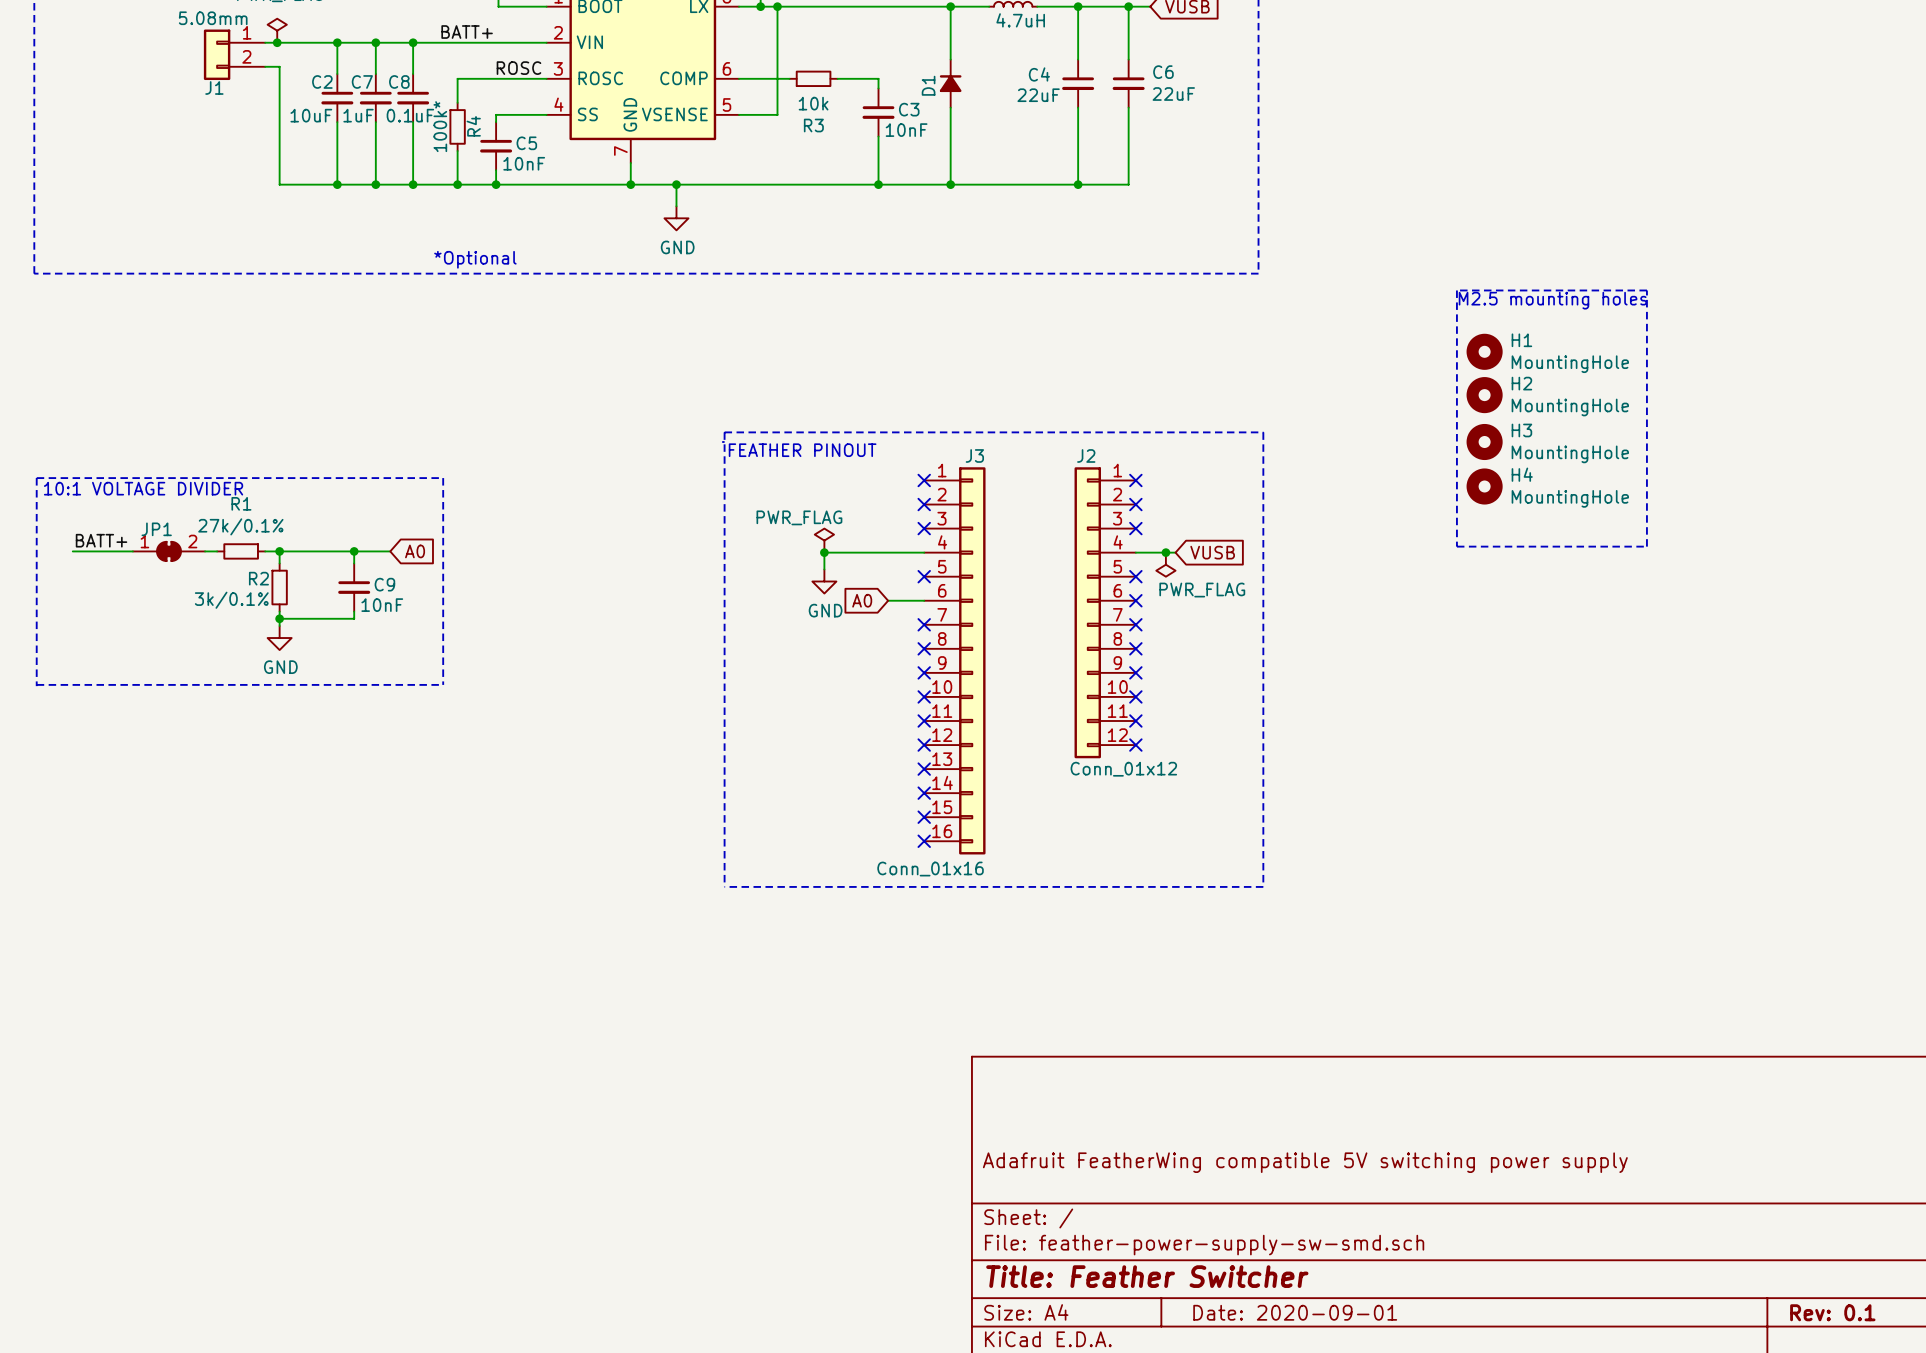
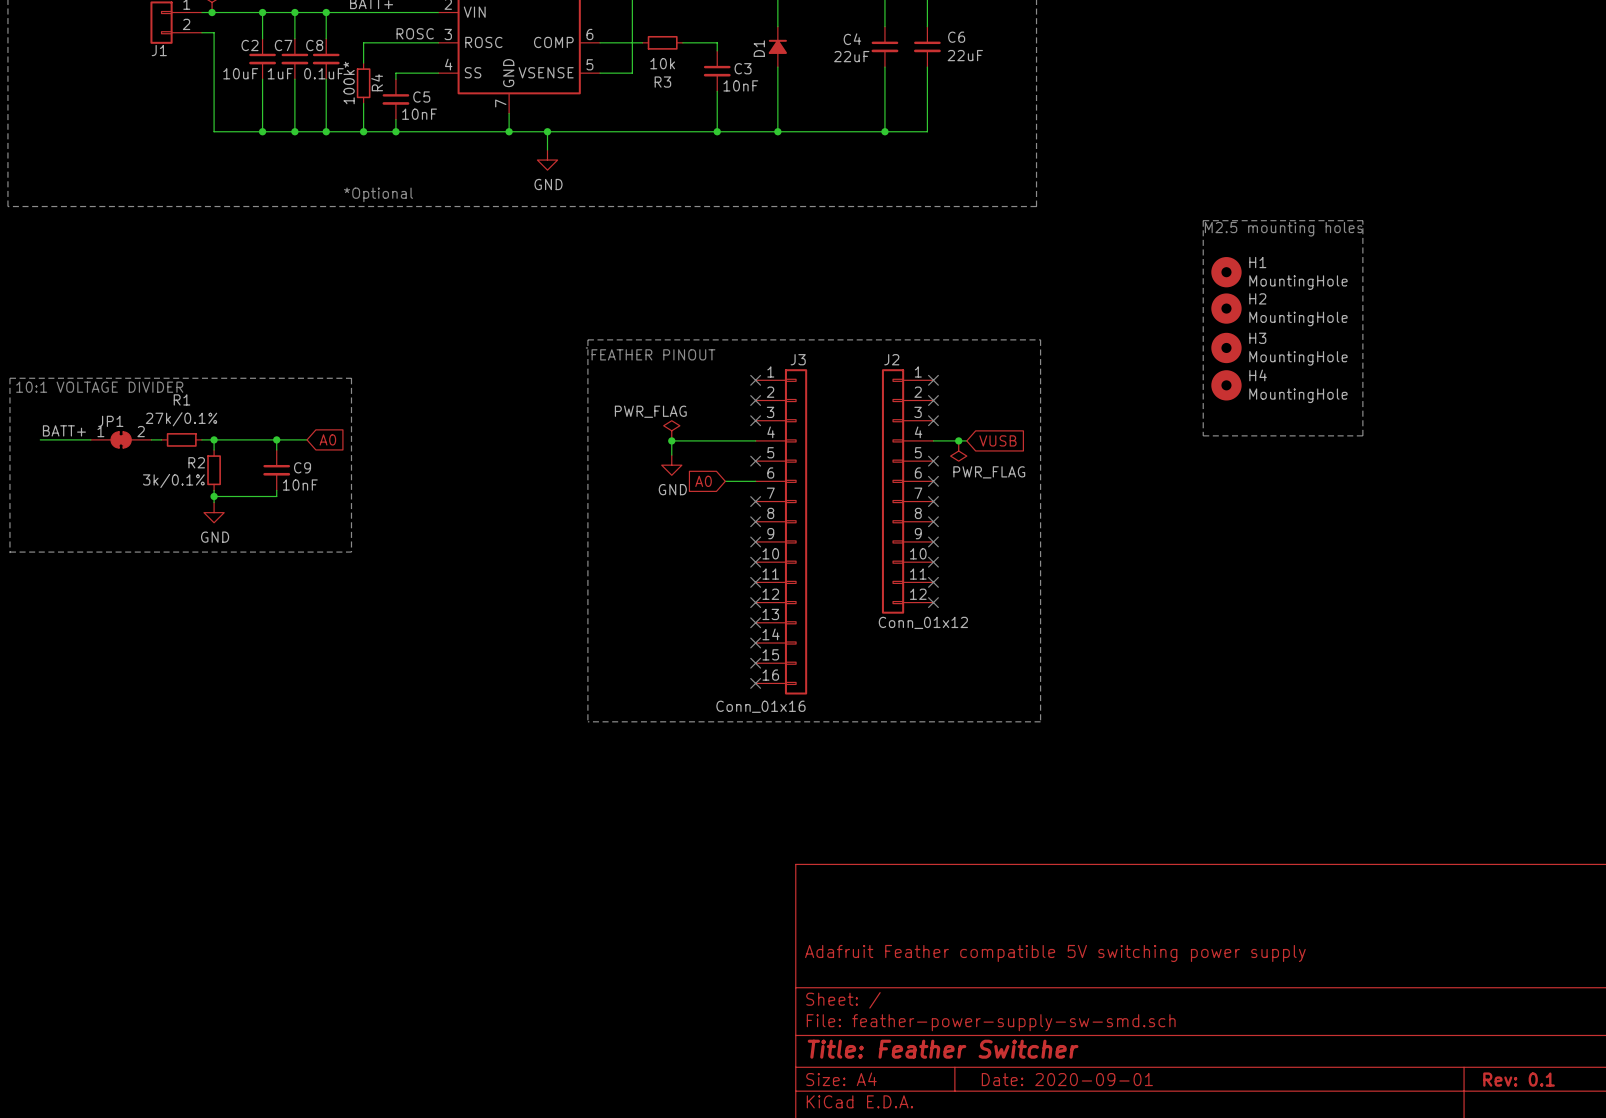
title block: Adafruit FeatherWing compatible 5V switching power supply (1305, 1162) -> Adafruit Feather compatible 5V switching power supply (1055, 953)

